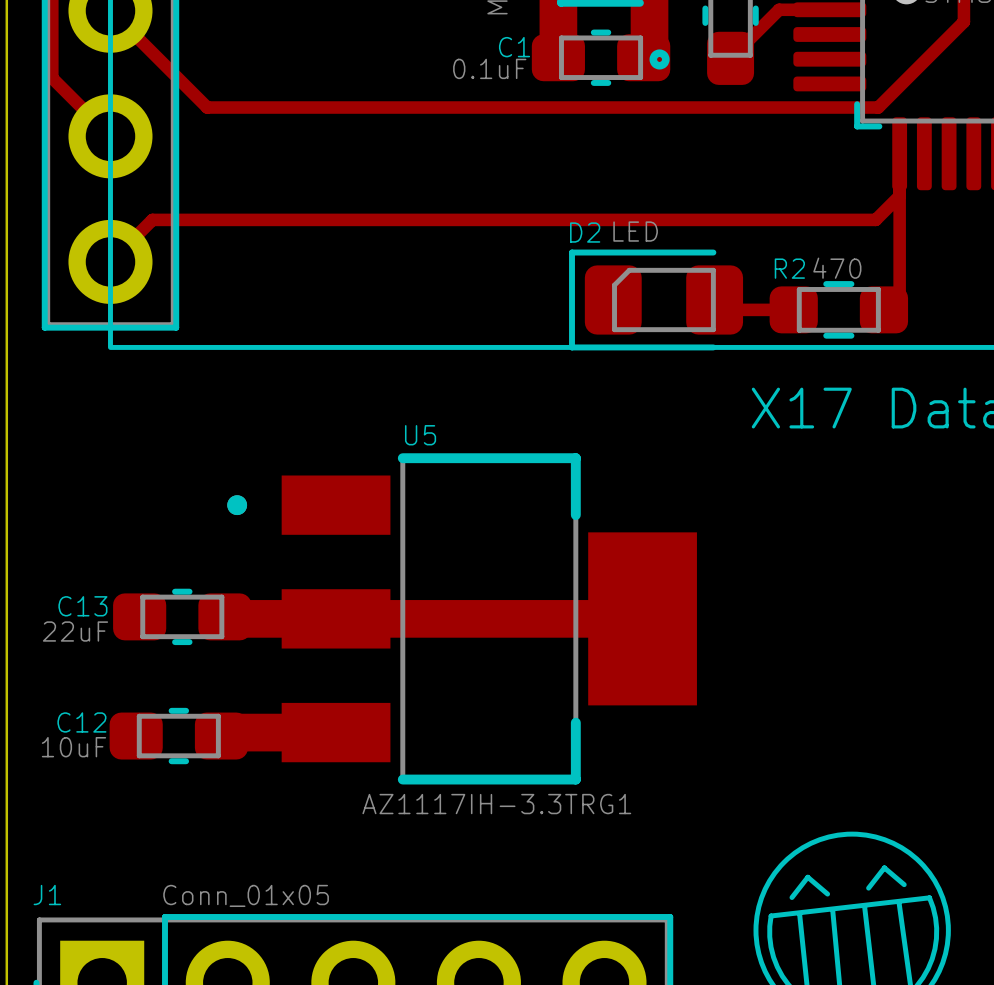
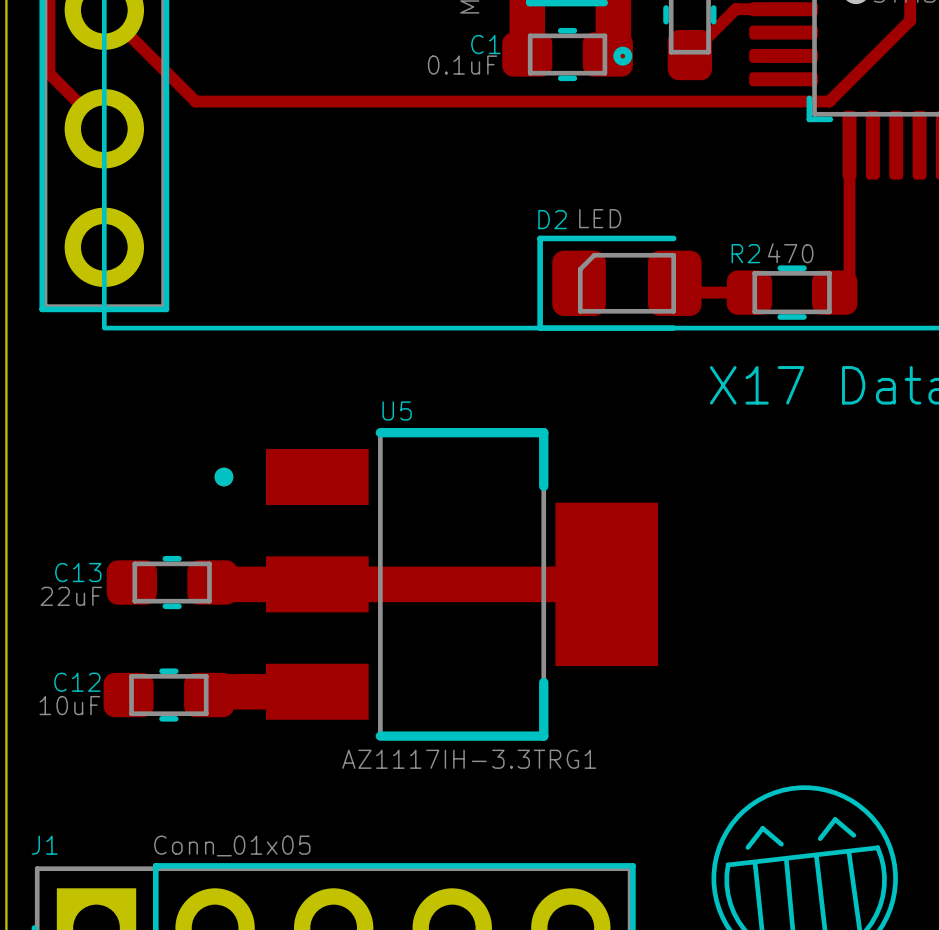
track: (899, 196) (875, 219) (152, 219) (110, 261) -> none

